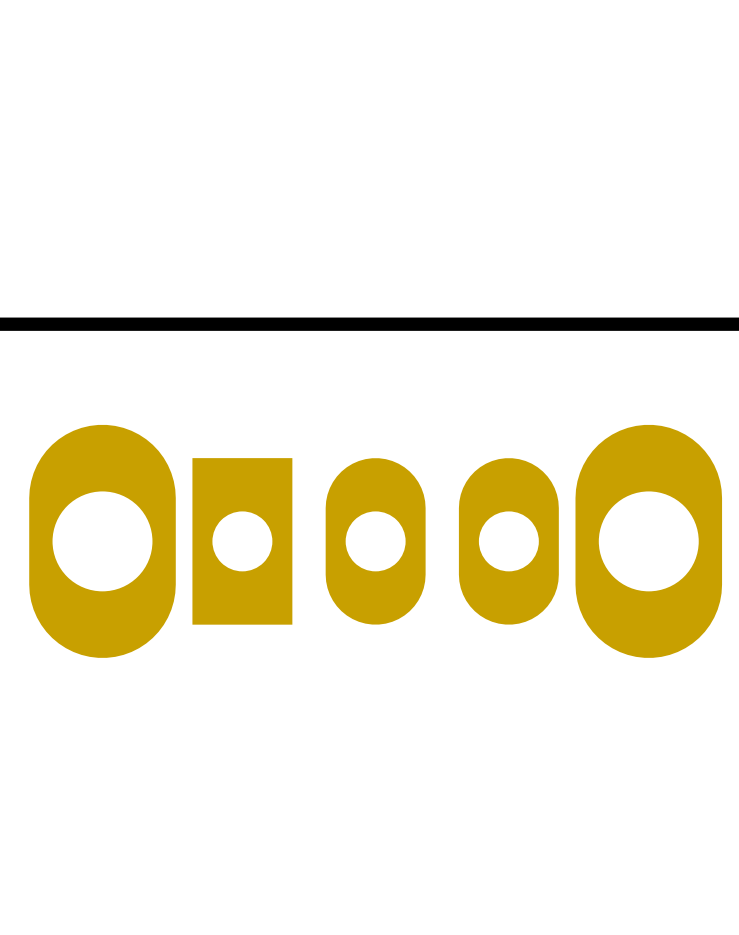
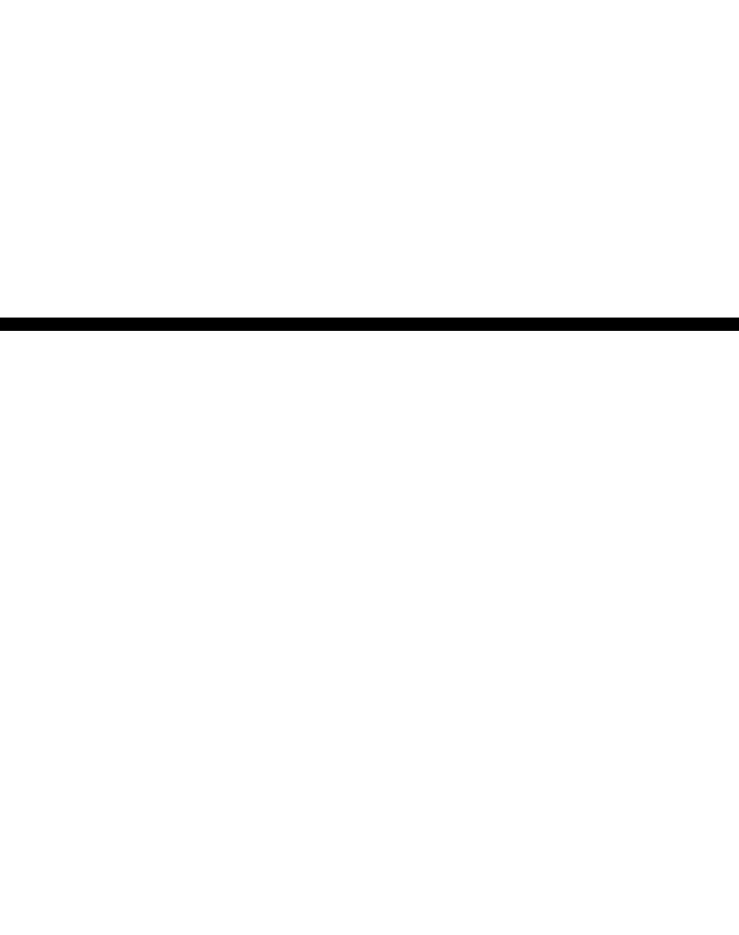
part: (375, 541) -> none

